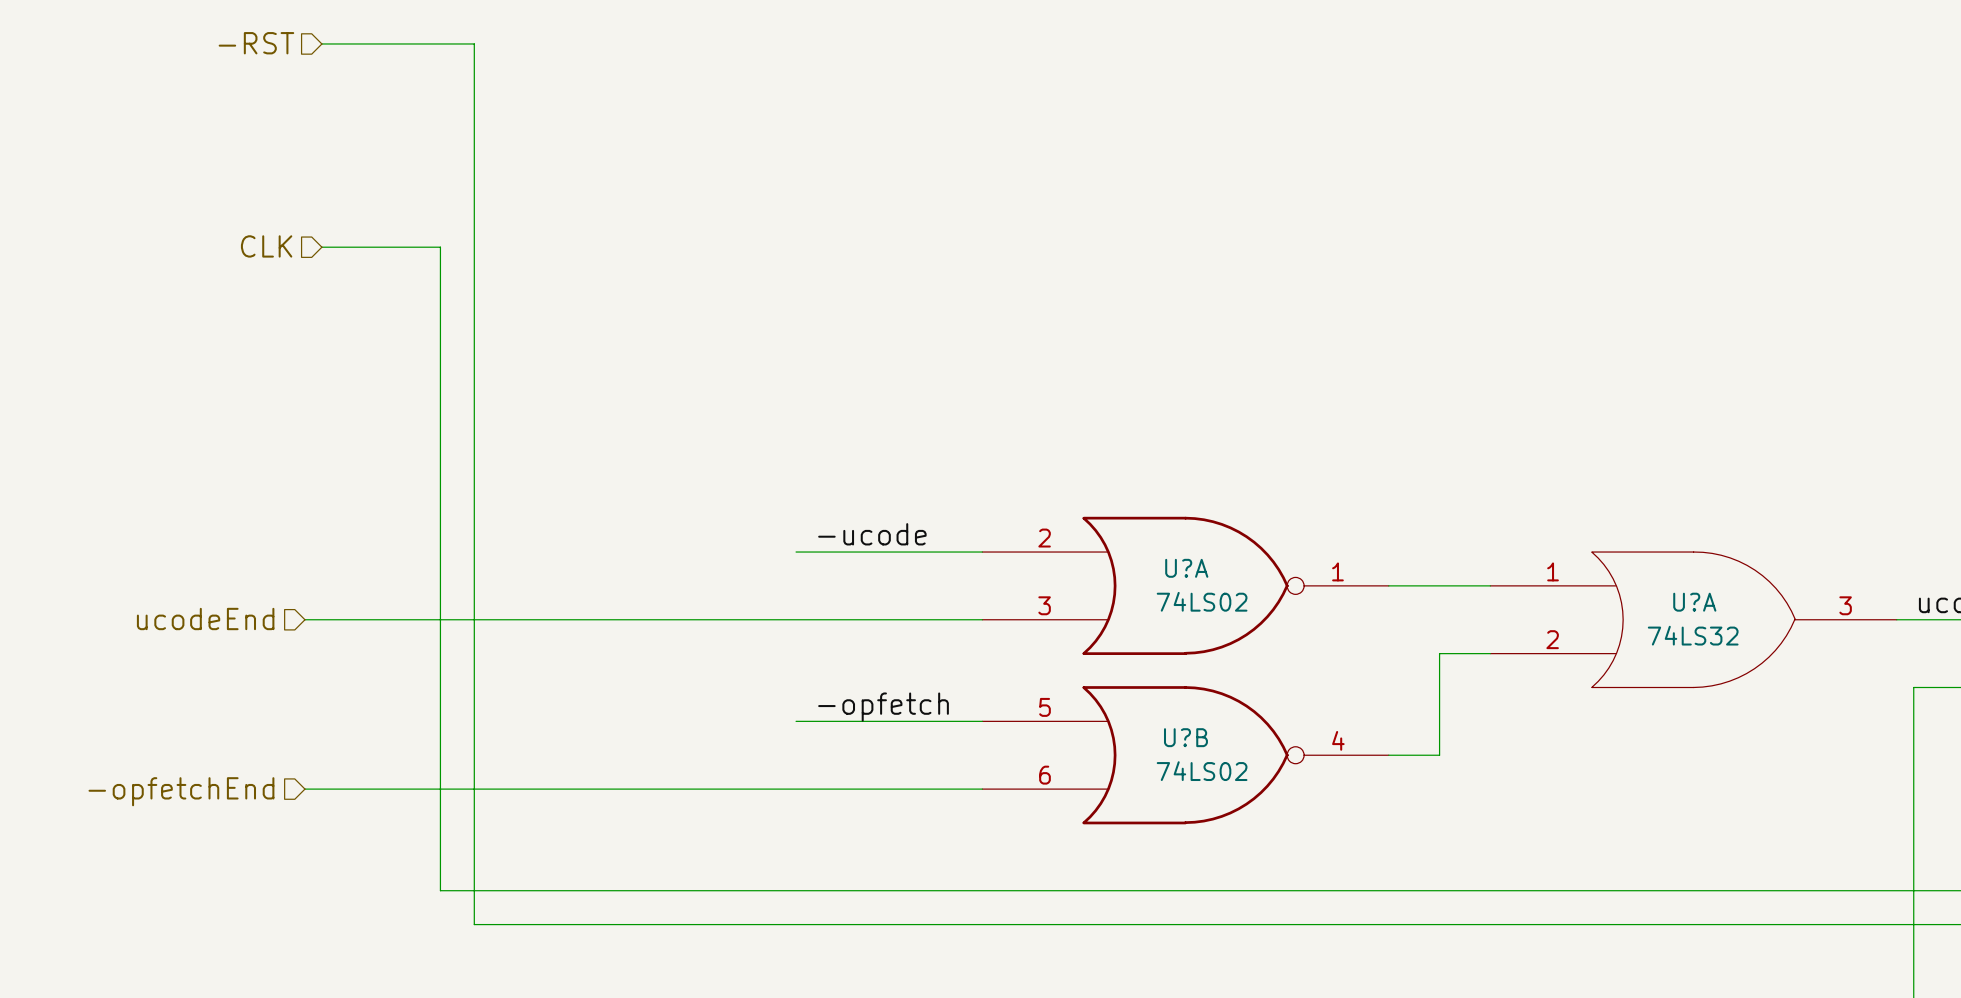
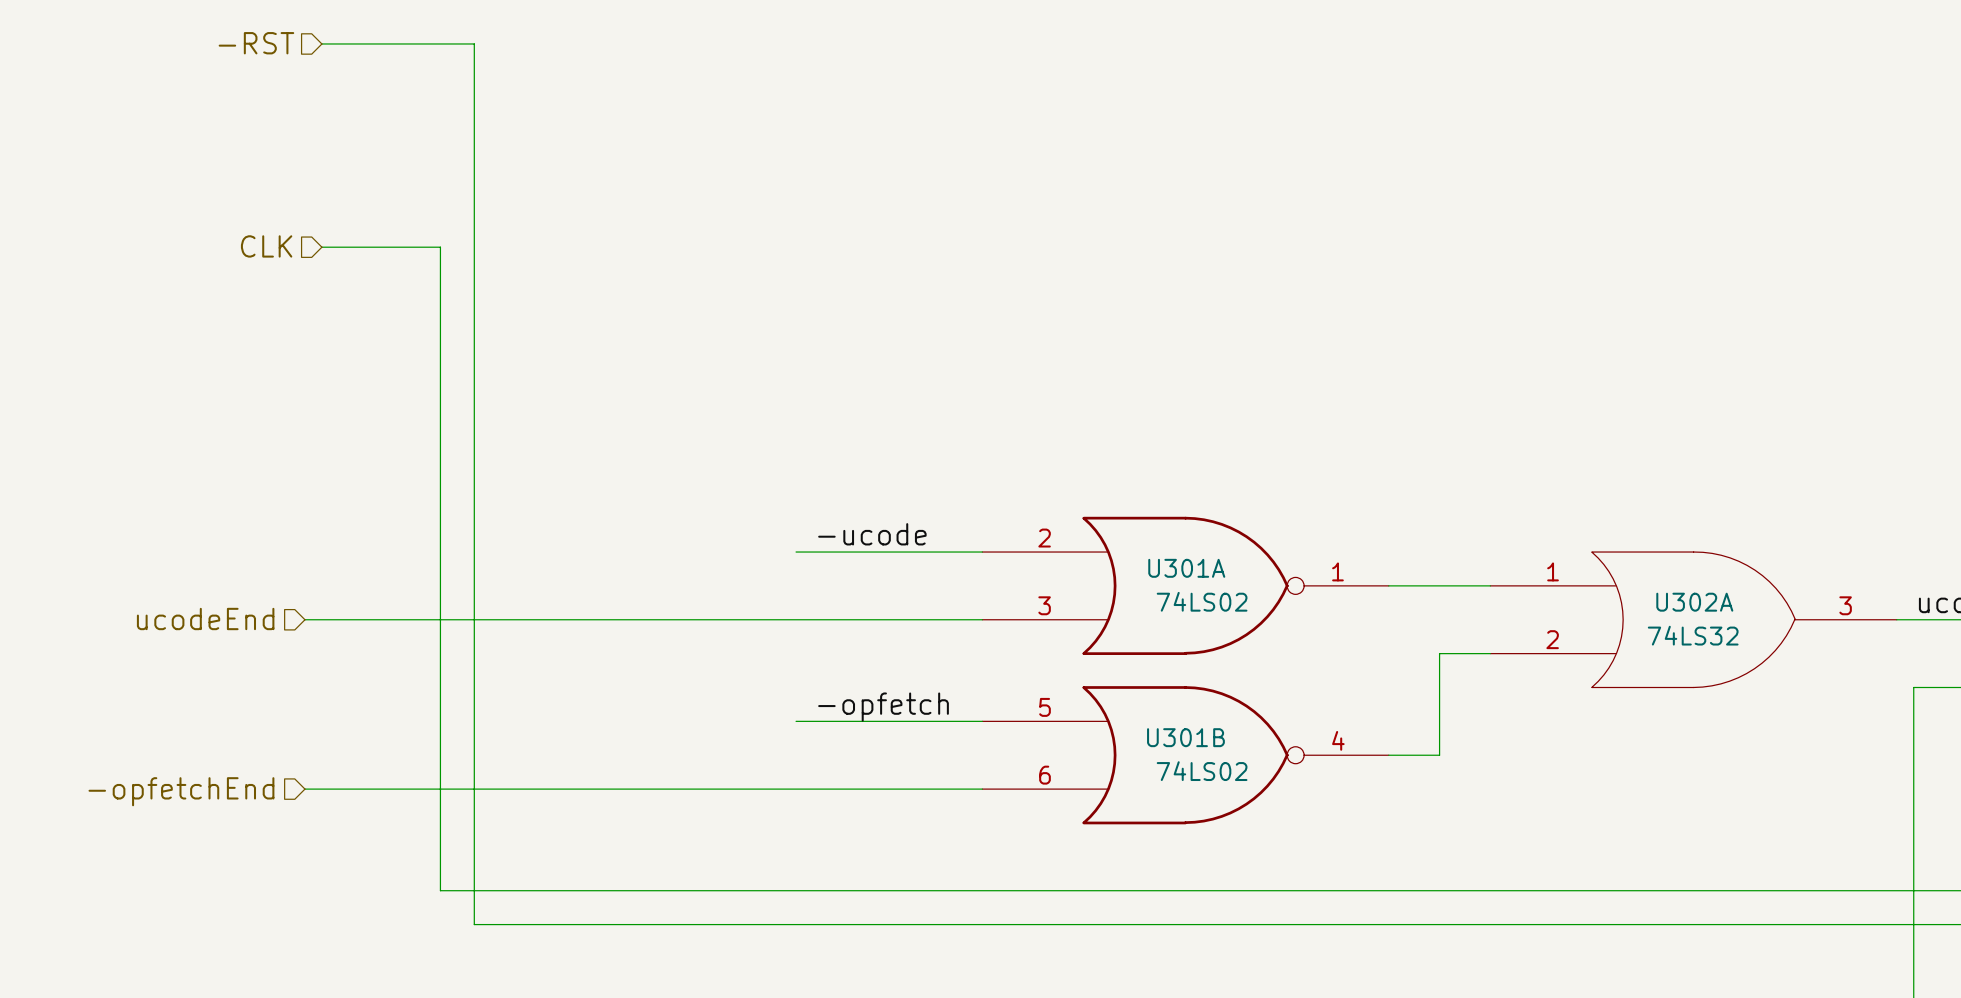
U?A name: U?A (1186, 568) -> U301A (1186, 568)
U?A name: U?A (1694, 602) -> U302A (1694, 602)
U?B name: U?B (1185, 737) -> U301B (1185, 737)

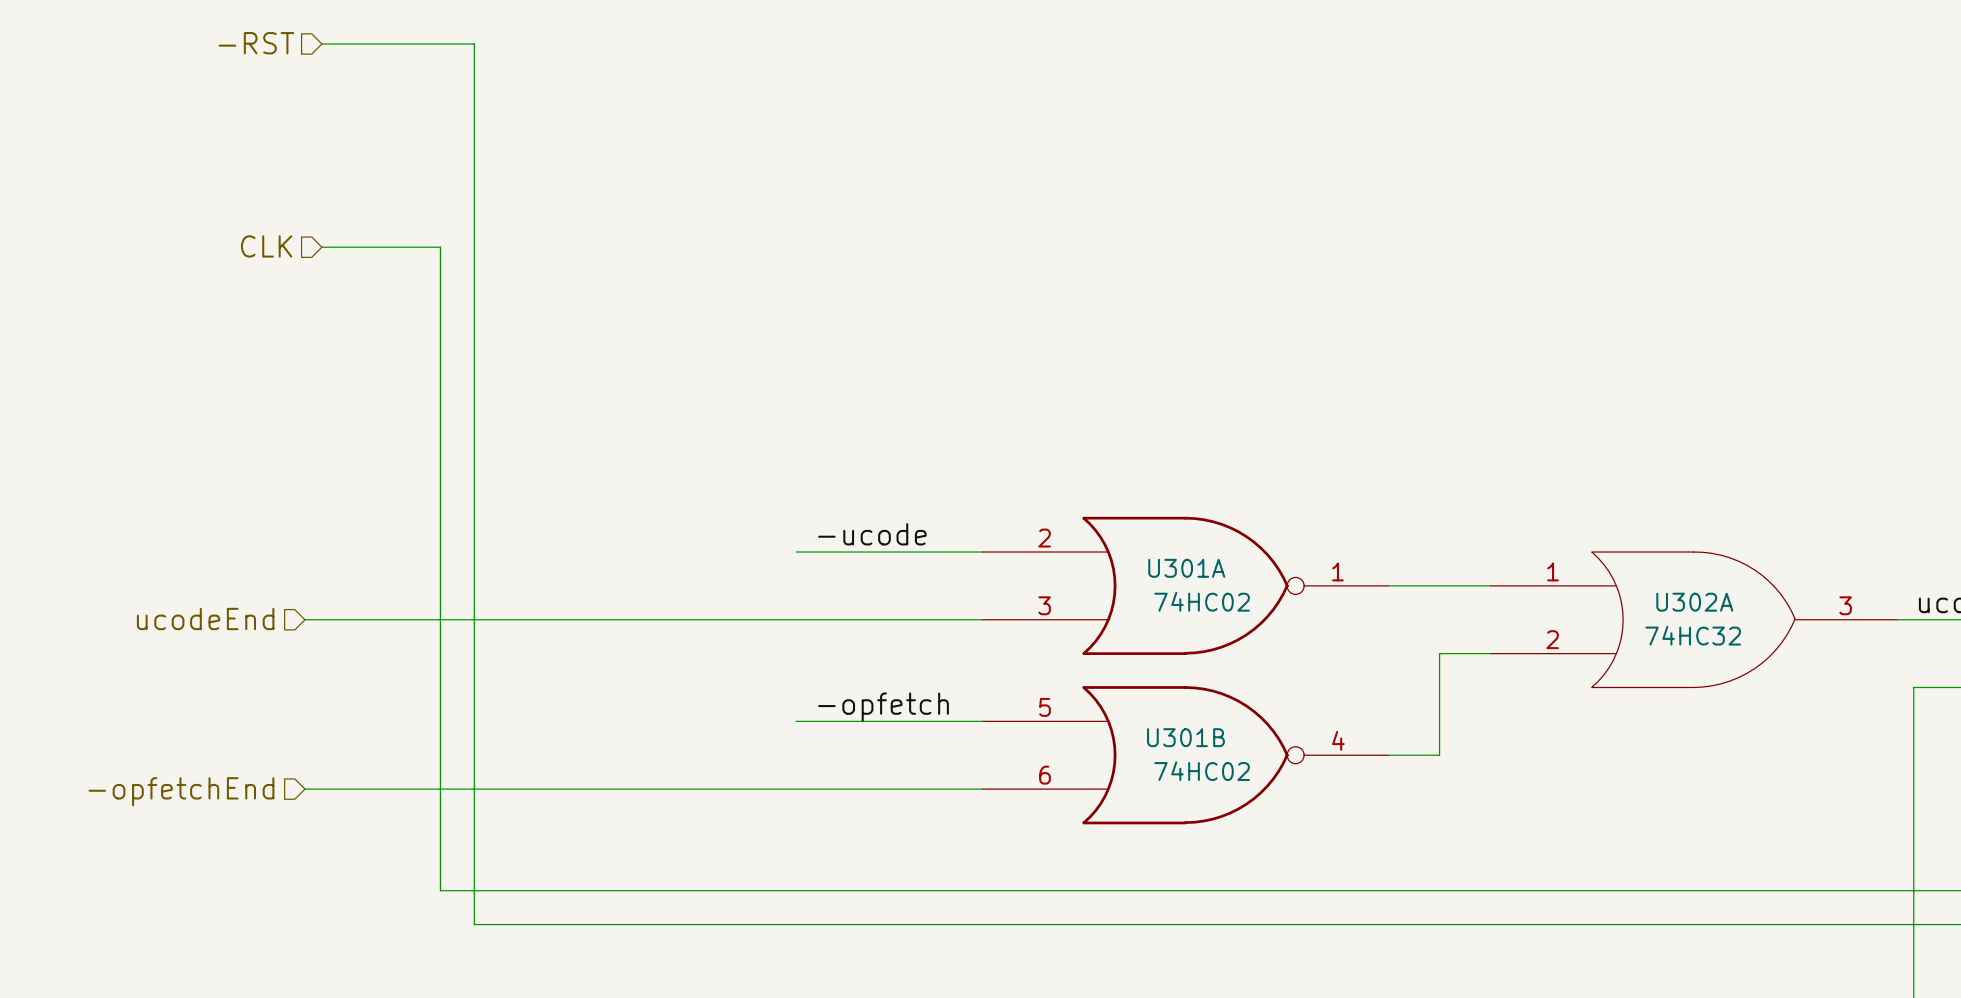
U301A value: 74LS02 (1202, 601) -> 74HC02 (1202, 601)
U302A value: 74LS32 (1693, 635) -> 74HC32 (1693, 635)
U301B value: 74LS02 (1202, 771) -> 74HC02 (1202, 771)

